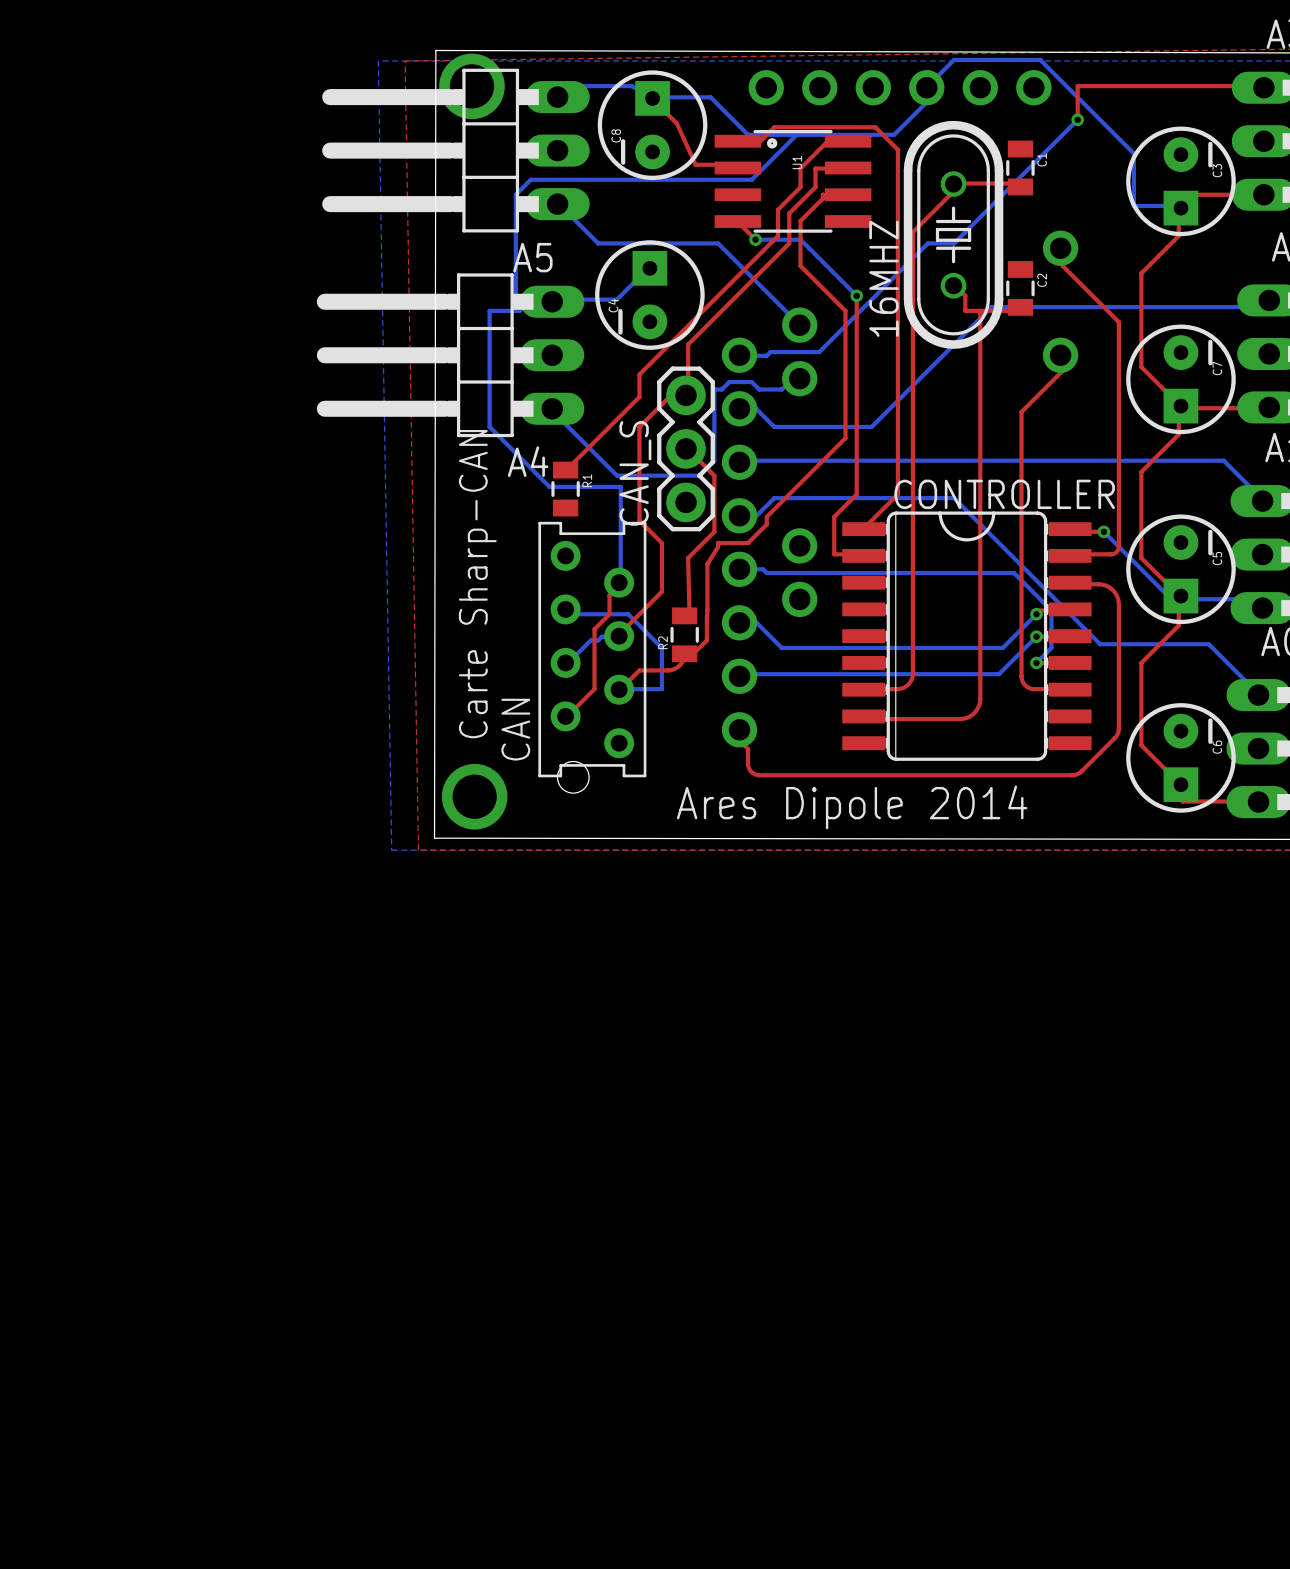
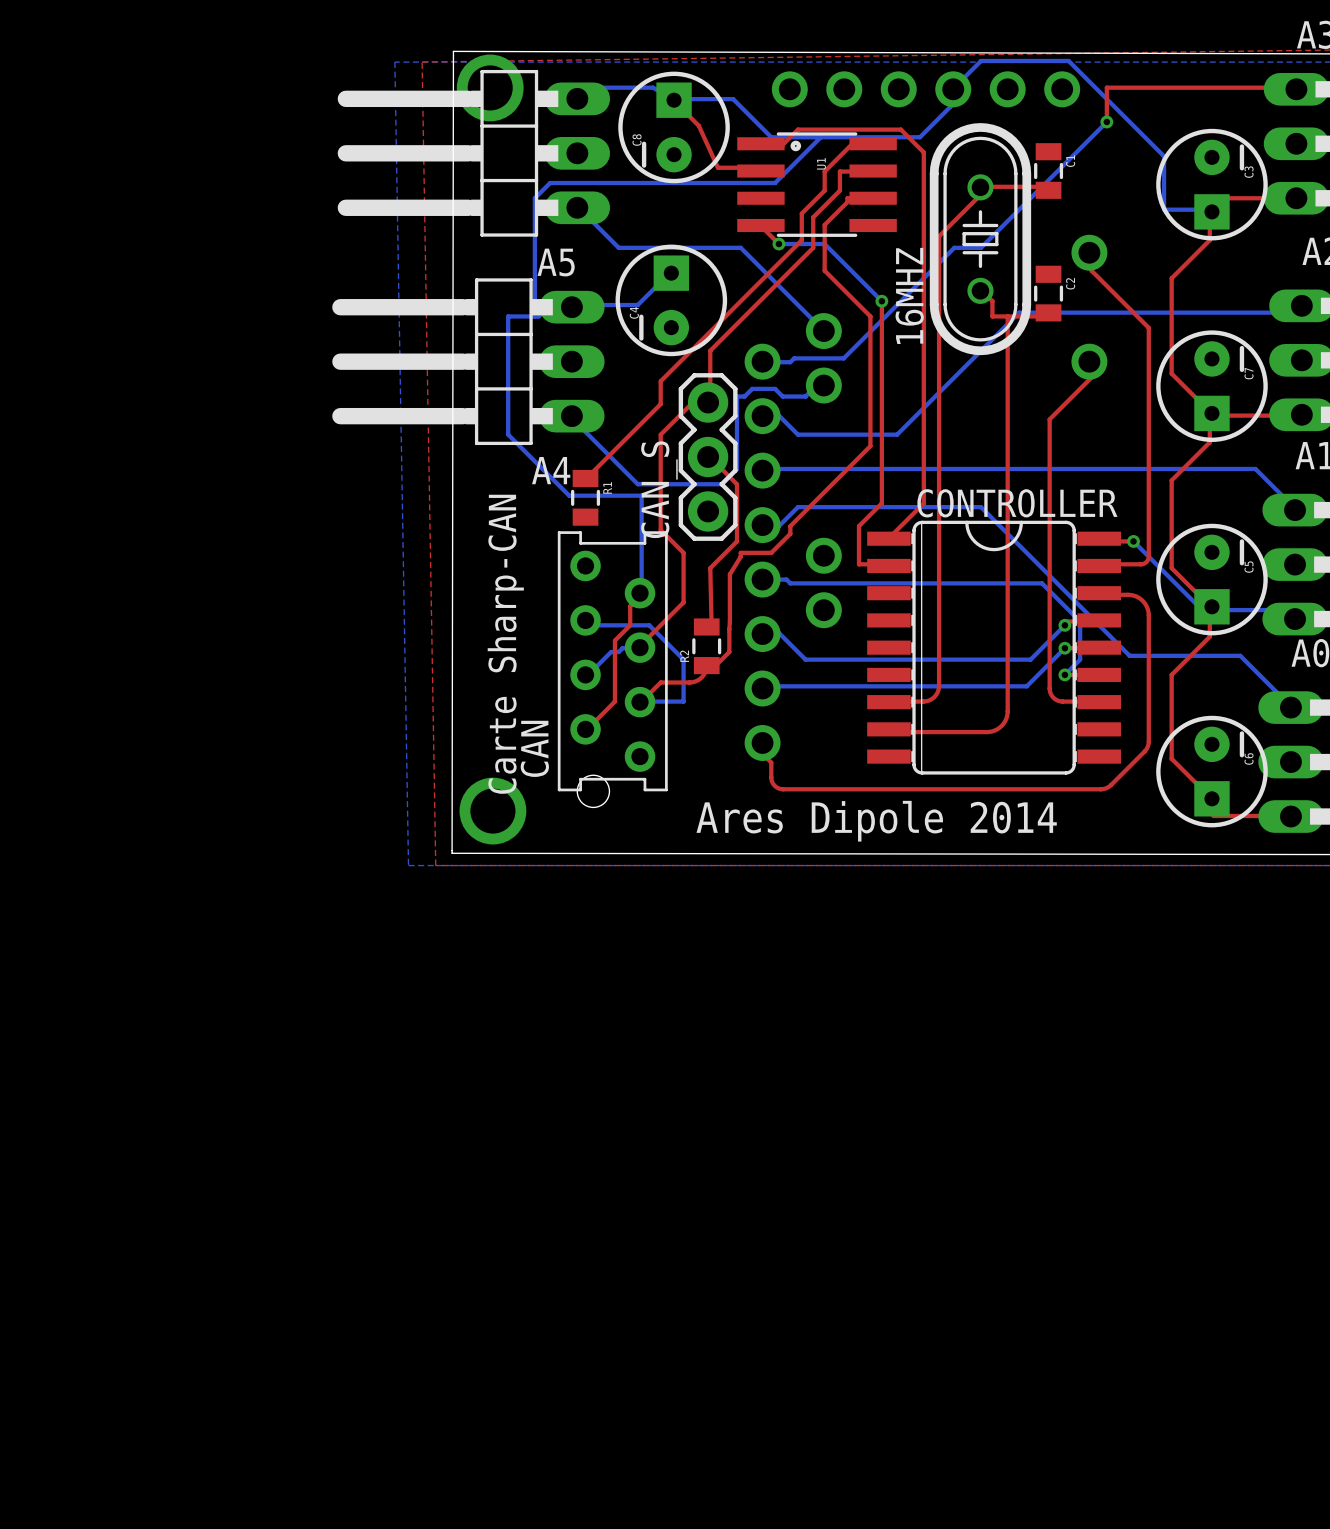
text position: Carte Sharp-CAN (477, 584) -> Carte Sharp-CAN (505, 644)

